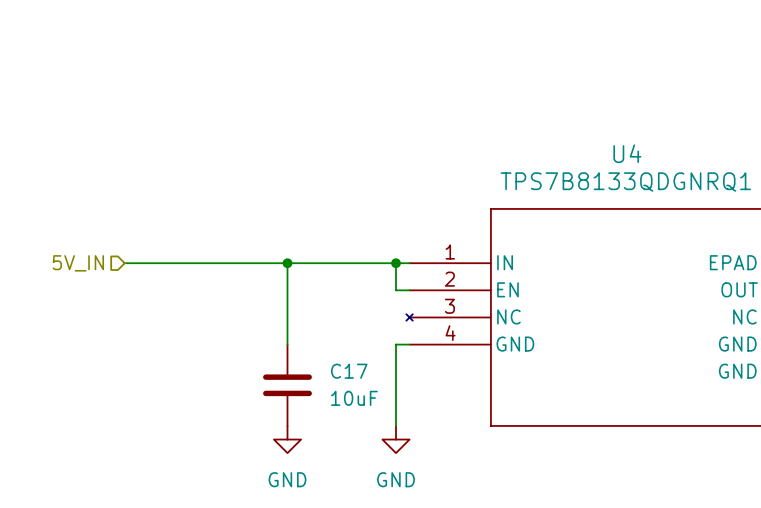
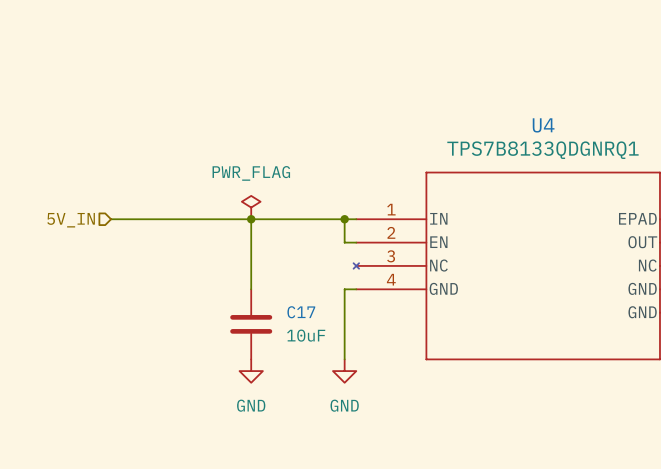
power symbol: none -> PWR_FLAG (251, 207)

